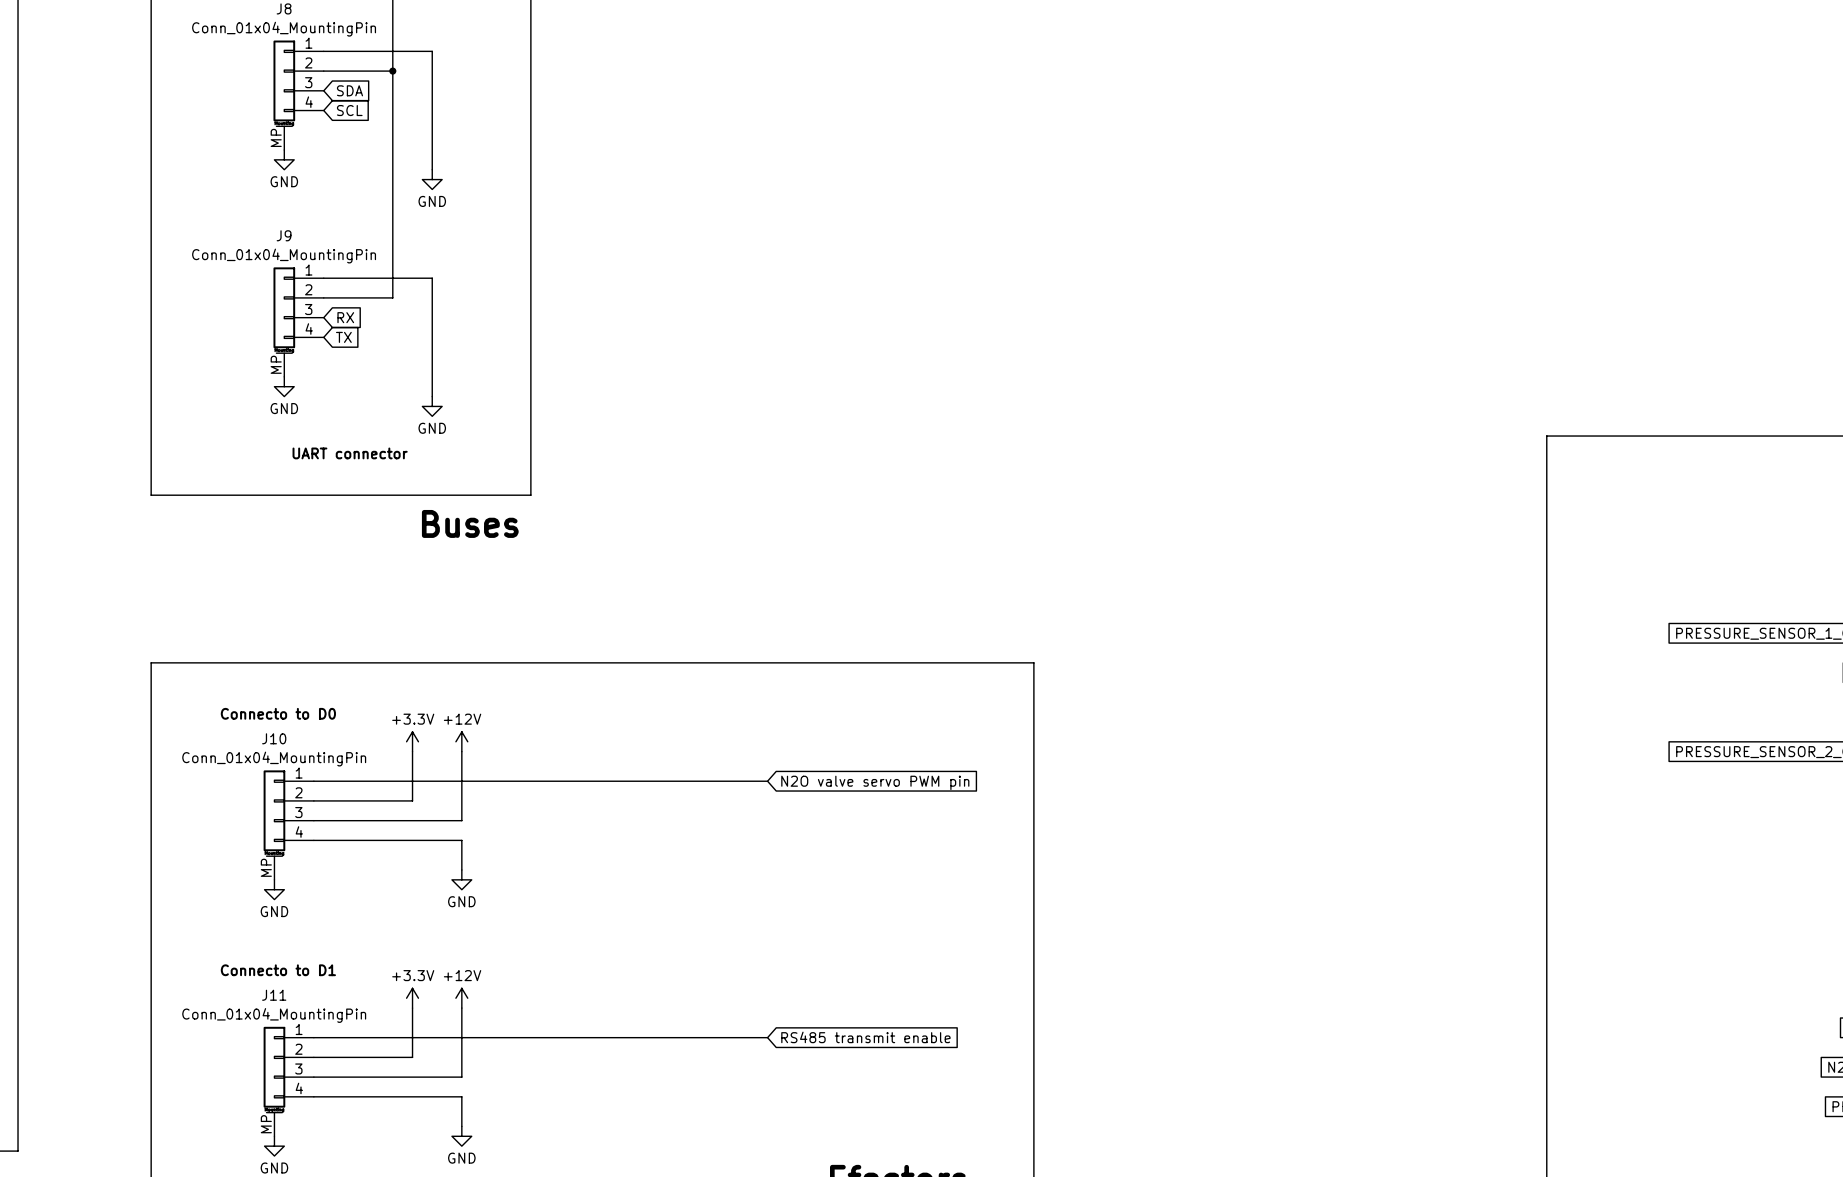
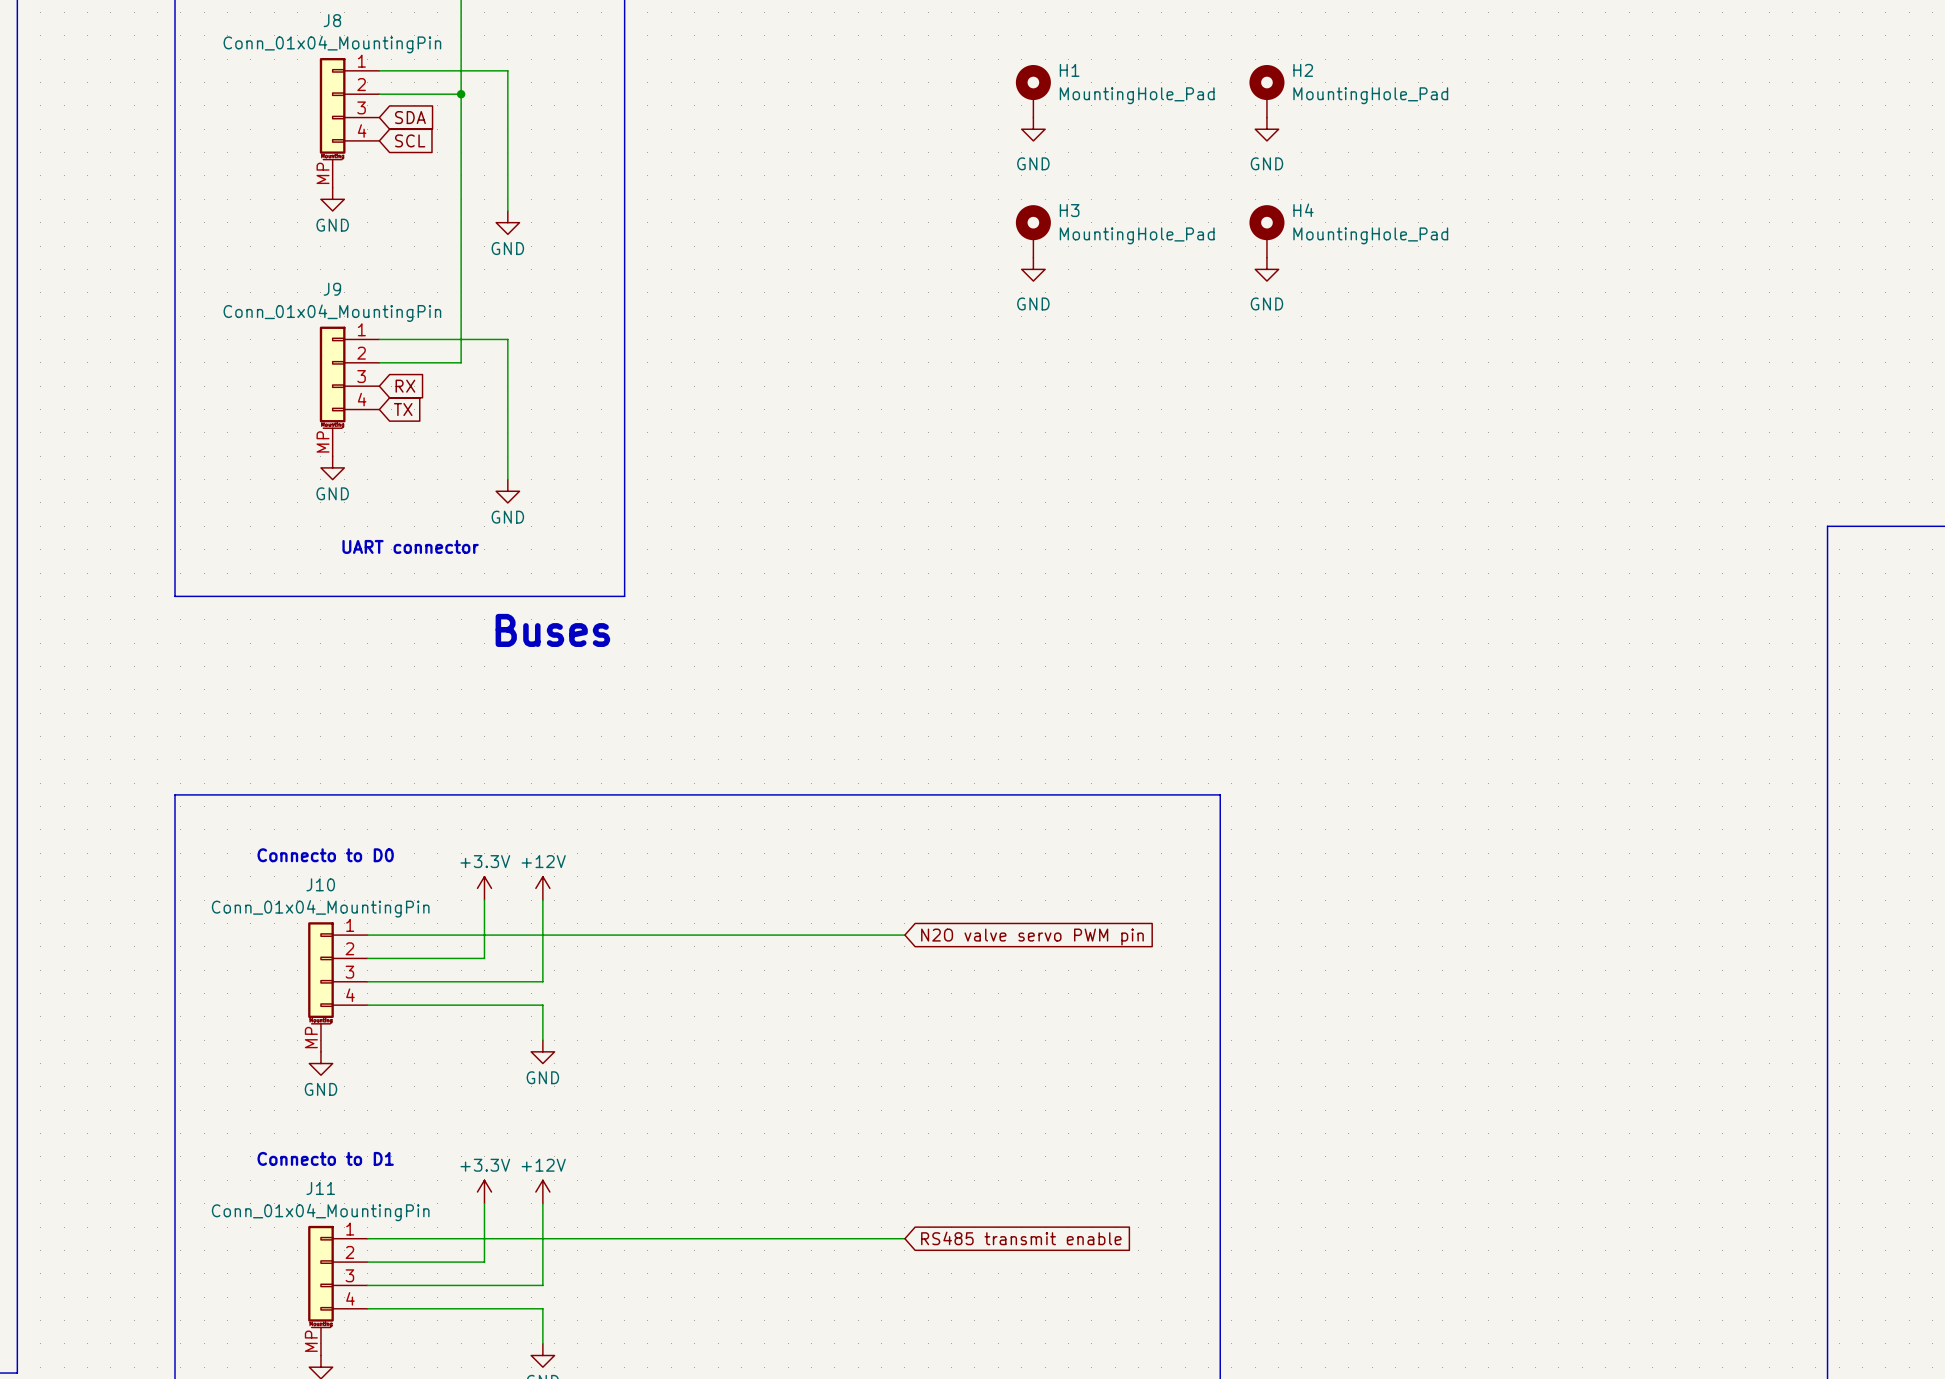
H1: none -> MountingHole_Pad (1033, 91)
H2: none -> MountingHole_Pad (1266, 91)
power symbol: none -> GND (1033, 129)
power symbol: none -> GND (1266, 129)
H3: none -> MountingHole_Pad (1033, 231)
H4: none -> MountingHole_Pad (1266, 231)
power symbol: none -> GND (1033, 269)
power symbol: none -> GND (1266, 269)

